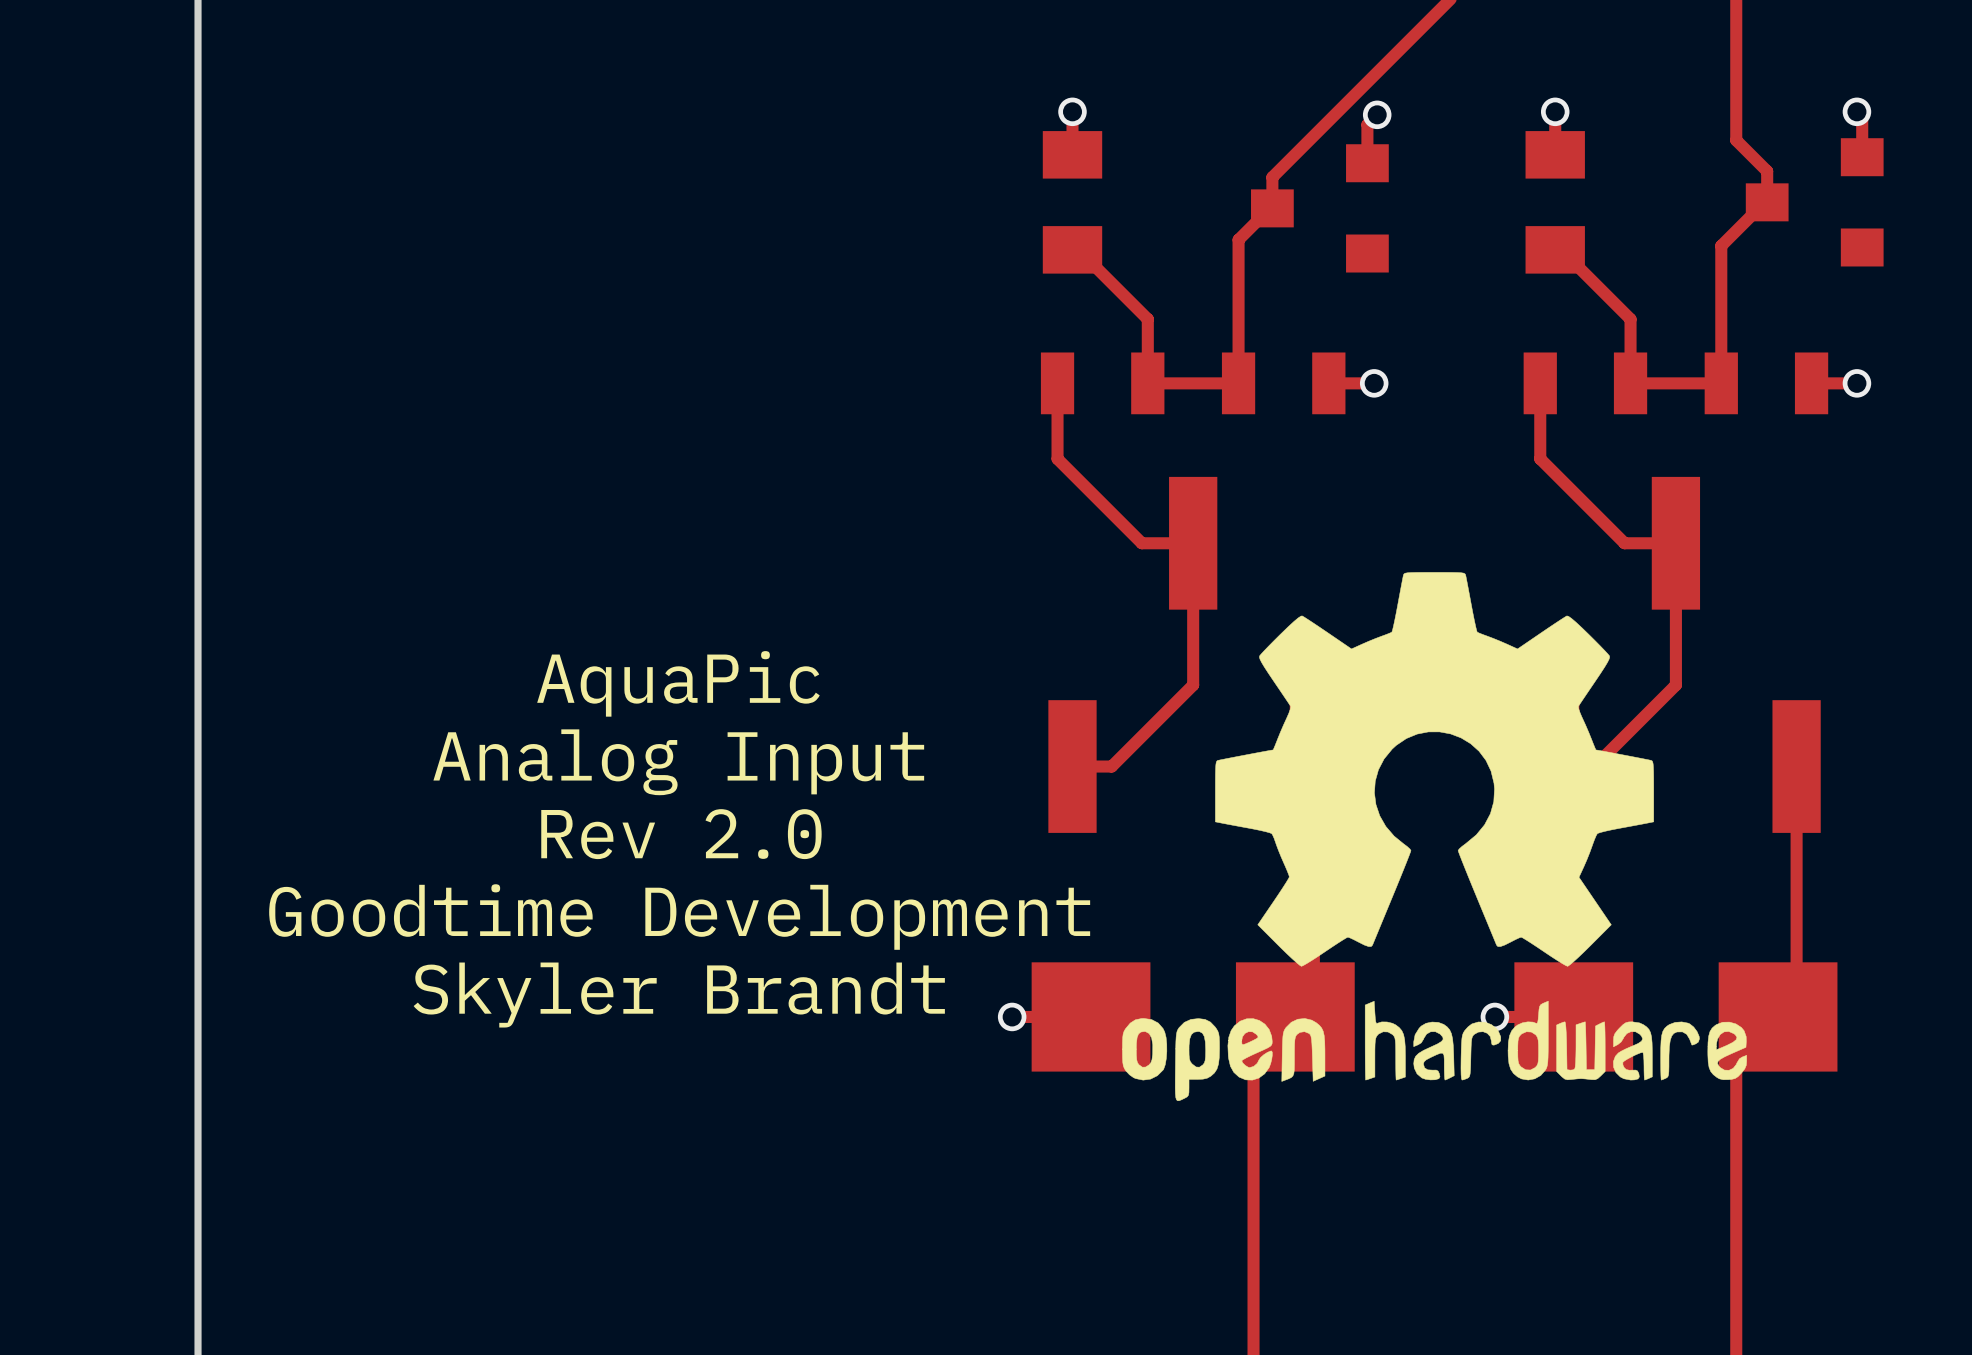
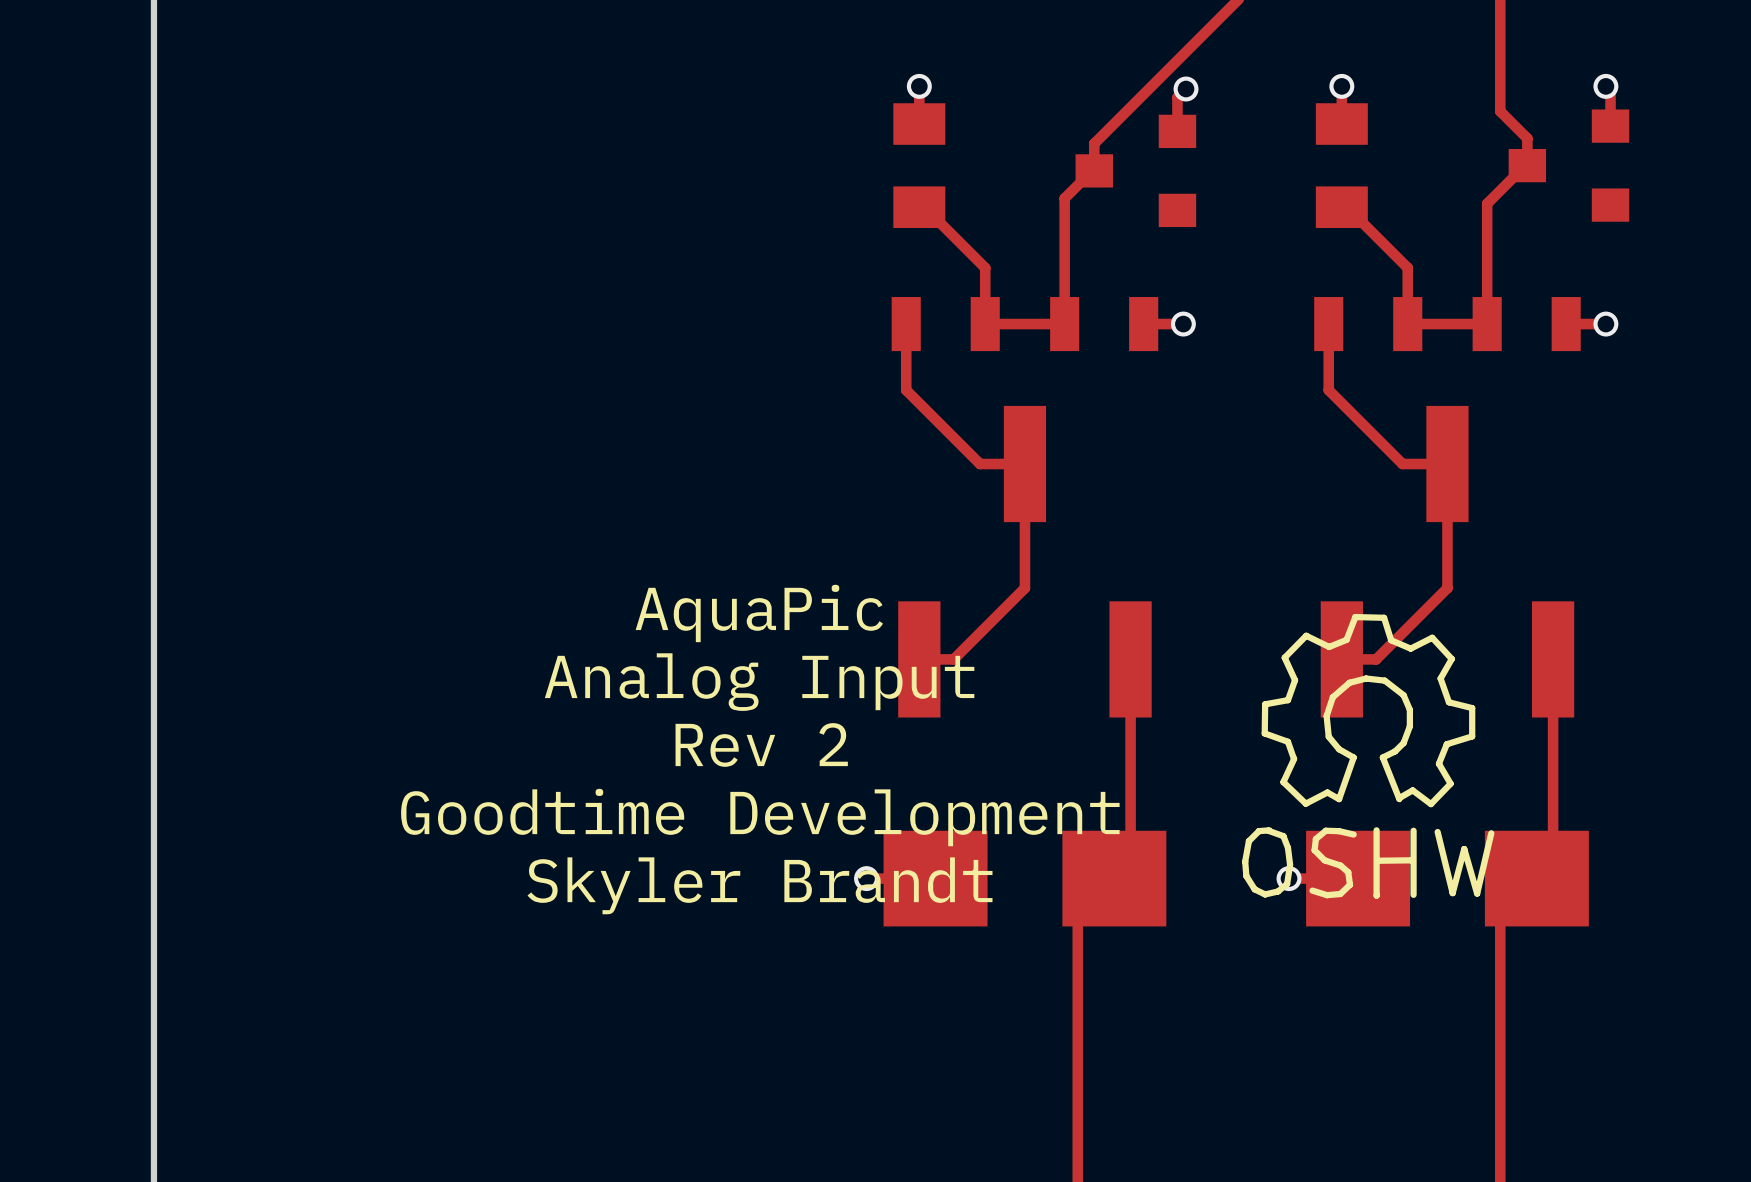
drawing: [1122, 572, 1747, 1102] -> none
text position: AquaPic (678, 683) -> AquaPic (759, 613)
drawing: none -> [1242, 613, 1495, 899]
text position: Analog Input (678, 762) -> Analog Input (759, 682)
text: Rev 2.0 (681, 834) -> Rev 2 (761, 744)
text position: Goodtime Development (679, 917) -> Goodtime Development (760, 817)
text position: Skyler Brandt (679, 995) -> Skyler Brandt (760, 885)

